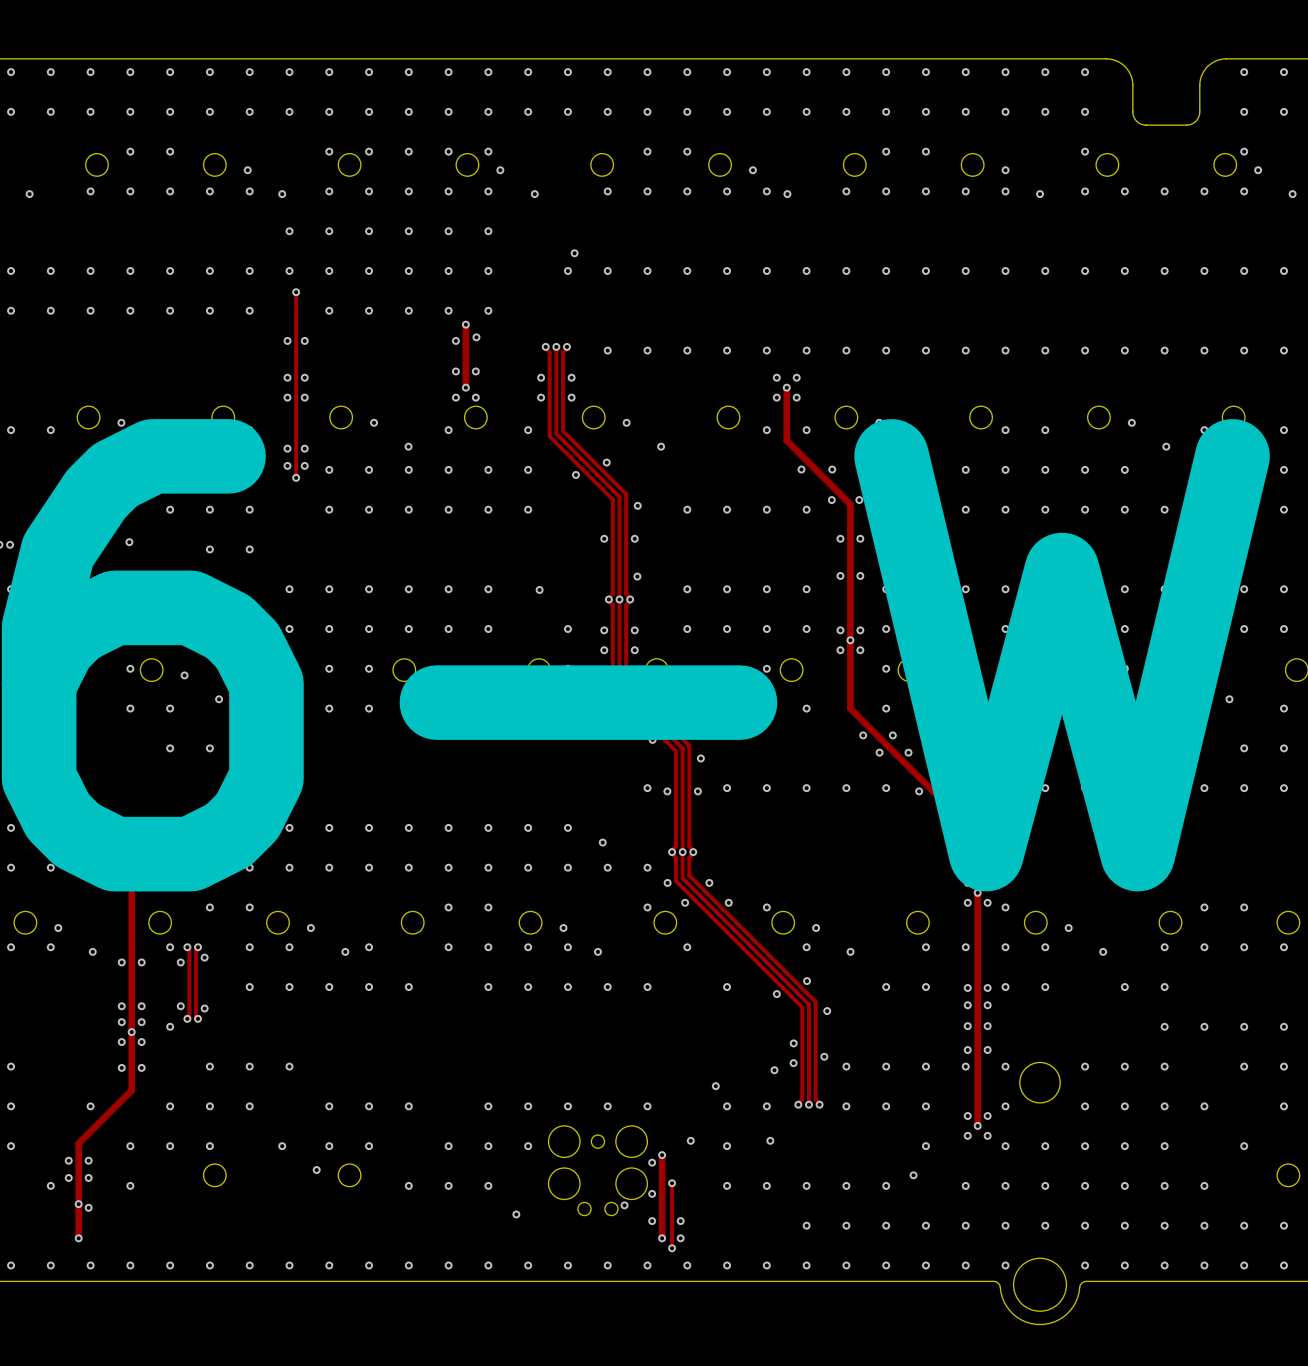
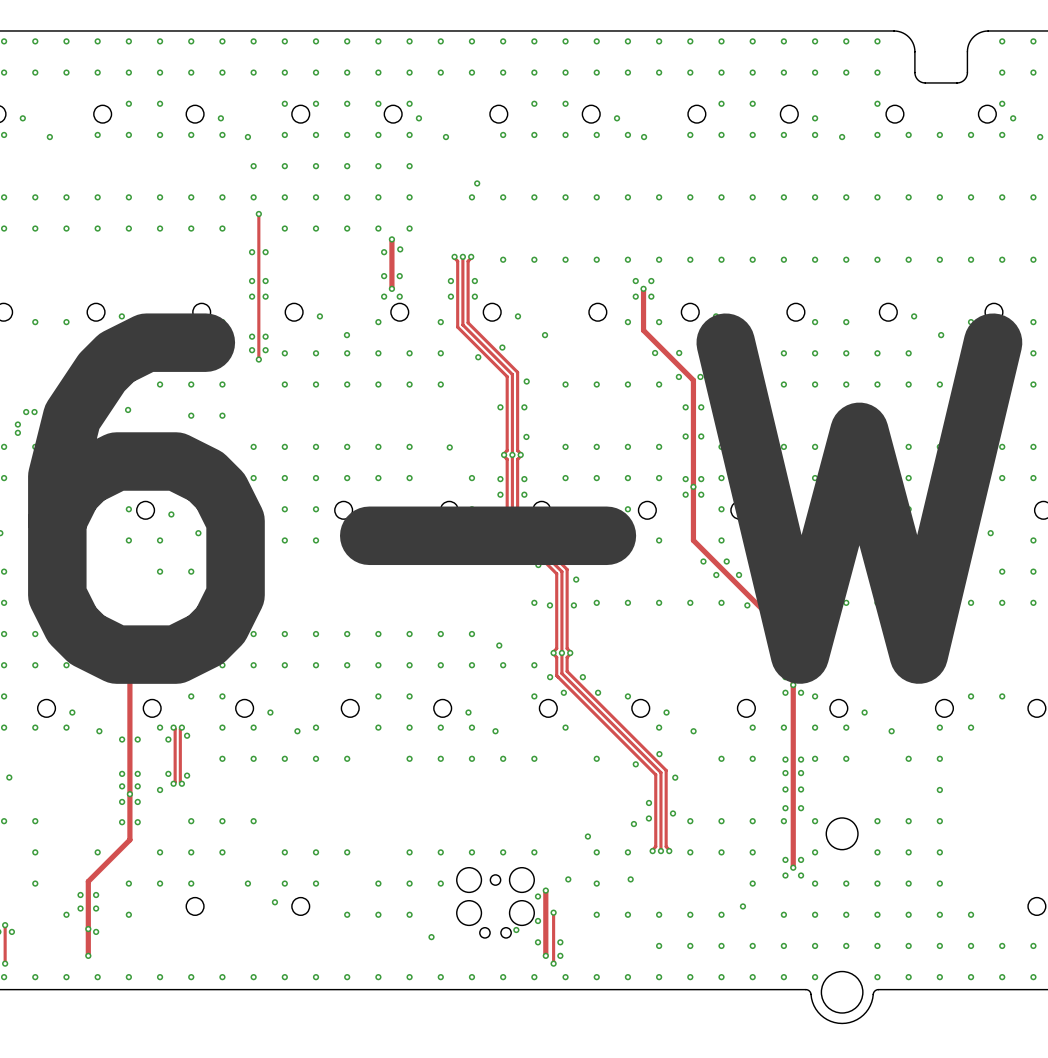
via: (1244, 947) -> none
via: (1283, 947) -> none
via: (1204, 1026) -> none
via: (1244, 1026) -> none
via: (1283, 1026) -> none
via: (1244, 1066) -> none
via: (1283, 1066) -> none
via: (1204, 1106) -> none
via: (1283, 1106) -> none
via: (1244, 1146) -> none

